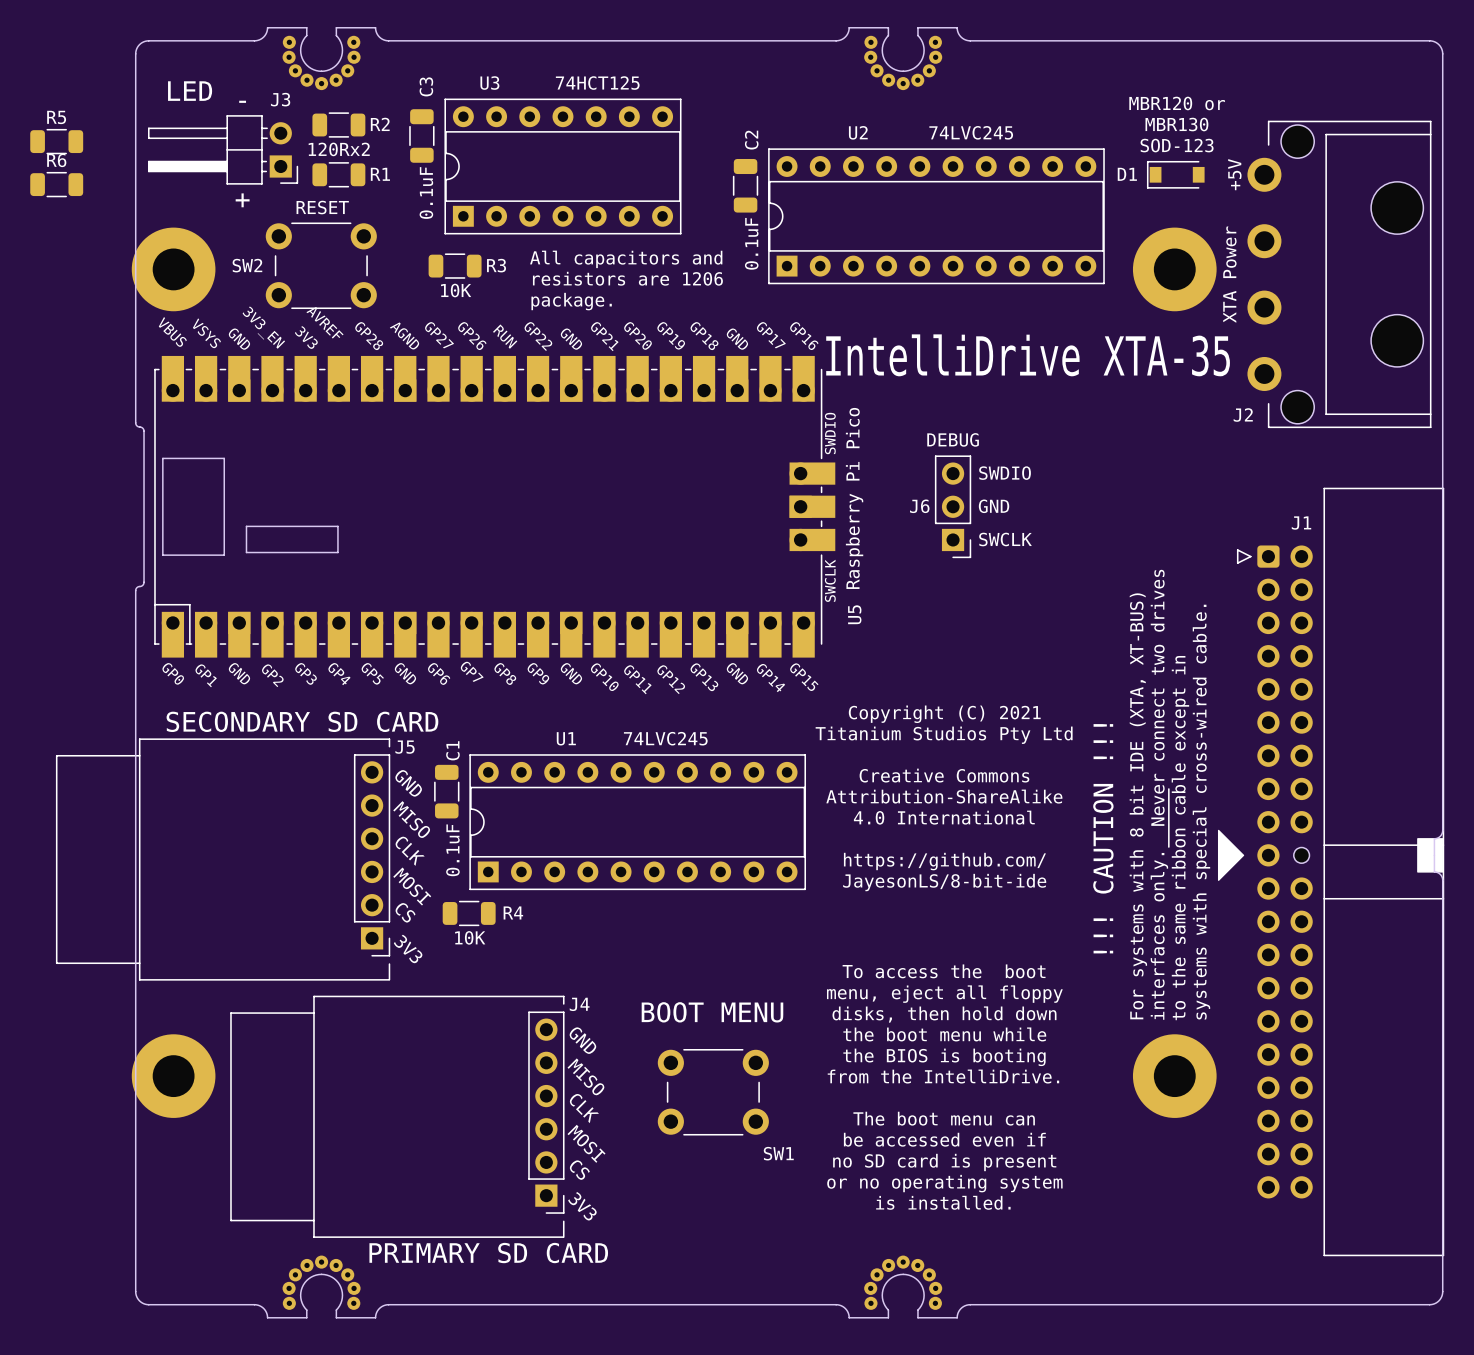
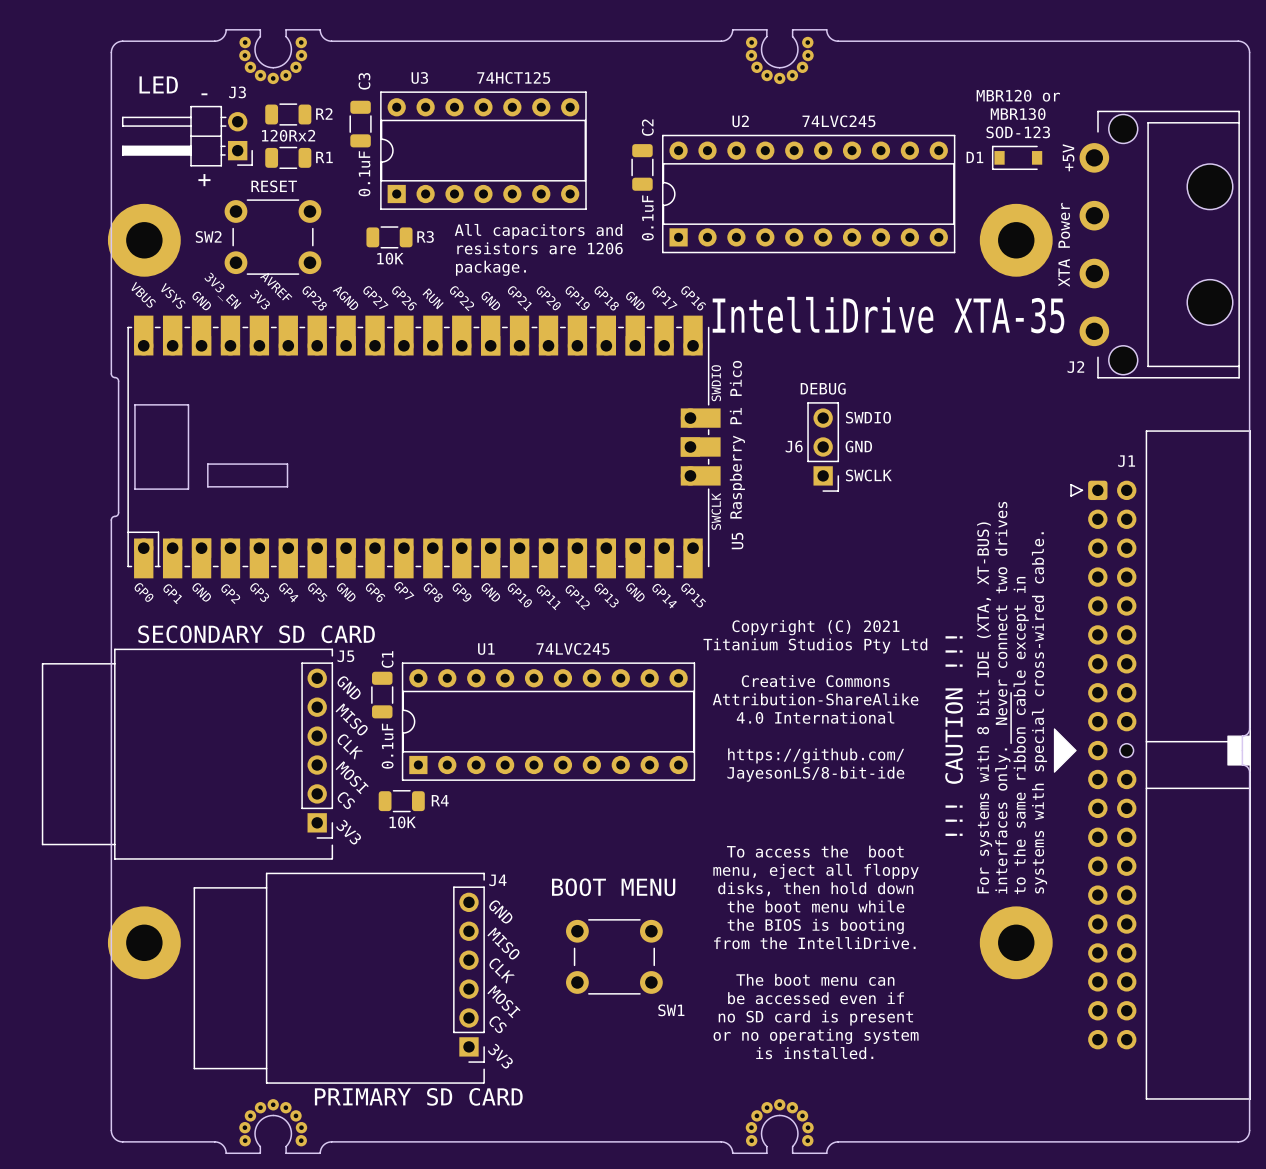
R5: (56, 141) -> none
R6: (56, 184) -> none

